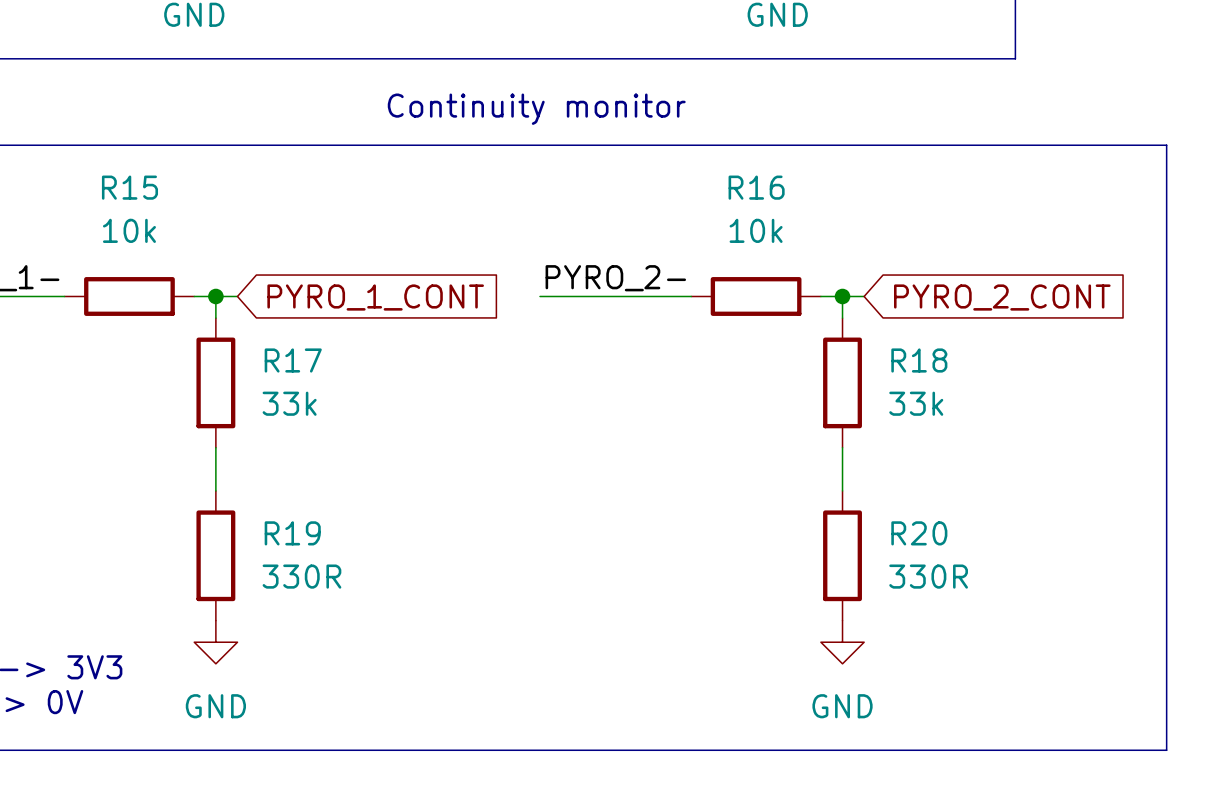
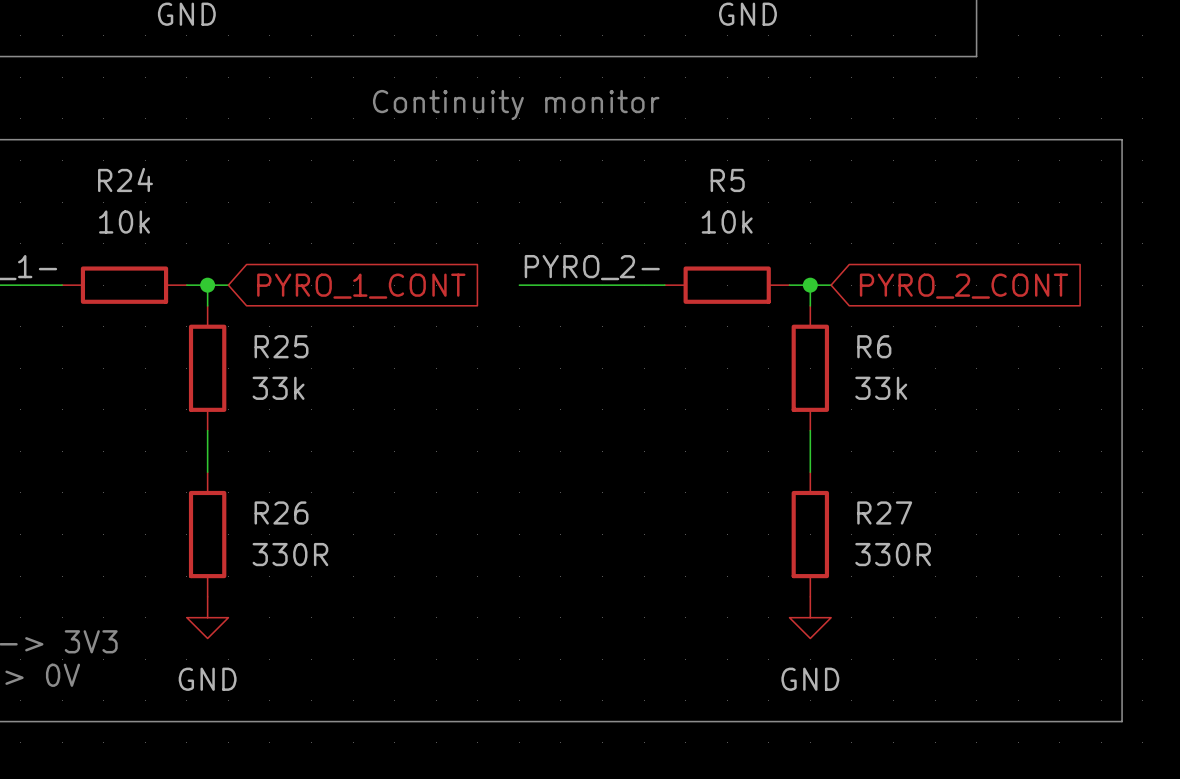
R15 name: R15 (129, 187) -> R24 (125, 179)
R16 name: R16 (756, 187) -> R5 (727, 180)
R17 name: R17 (293, 360) -> R25 (281, 346)
R18 name: R18 (919, 360) -> R6 (874, 346)
R19 name: R19 (292, 533) -> R26 (281, 512)
R20 name: R20 (919, 533) -> R27 (884, 512)

